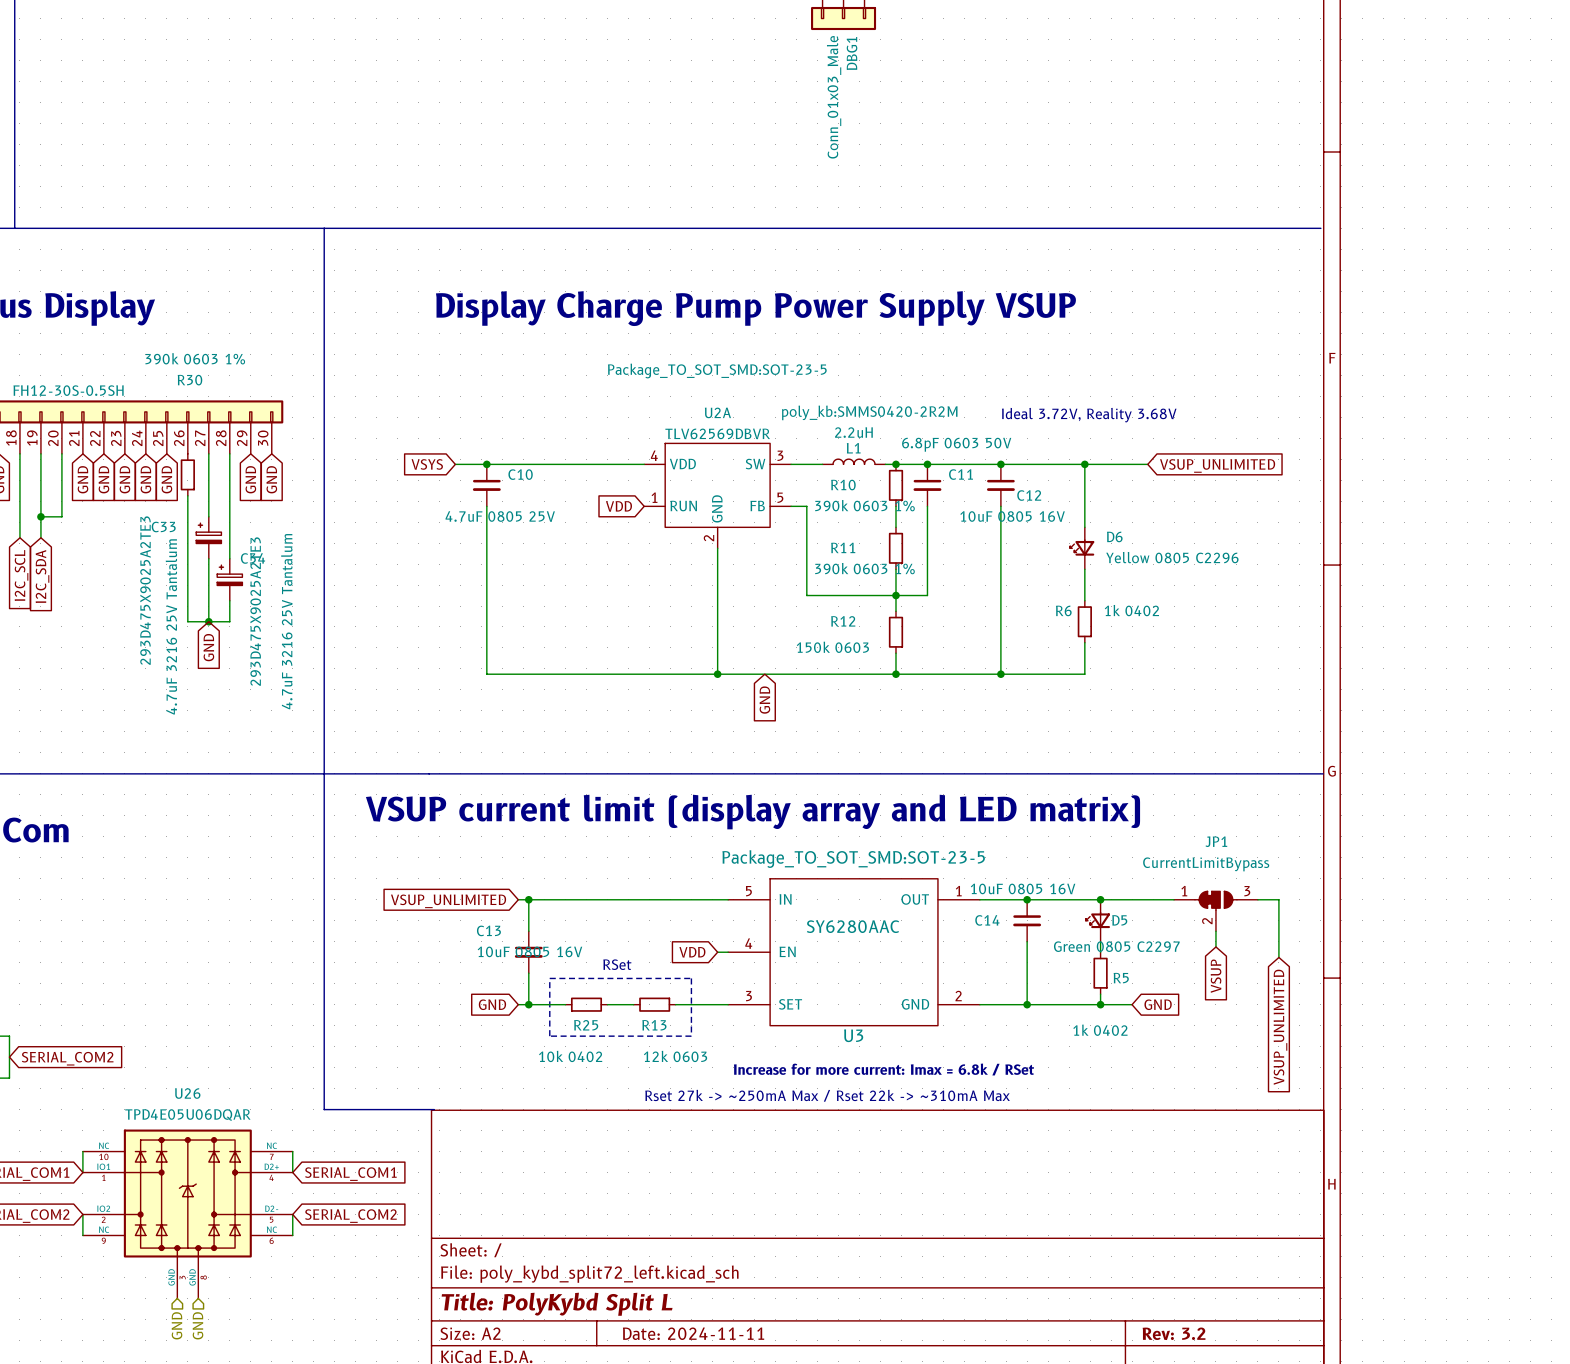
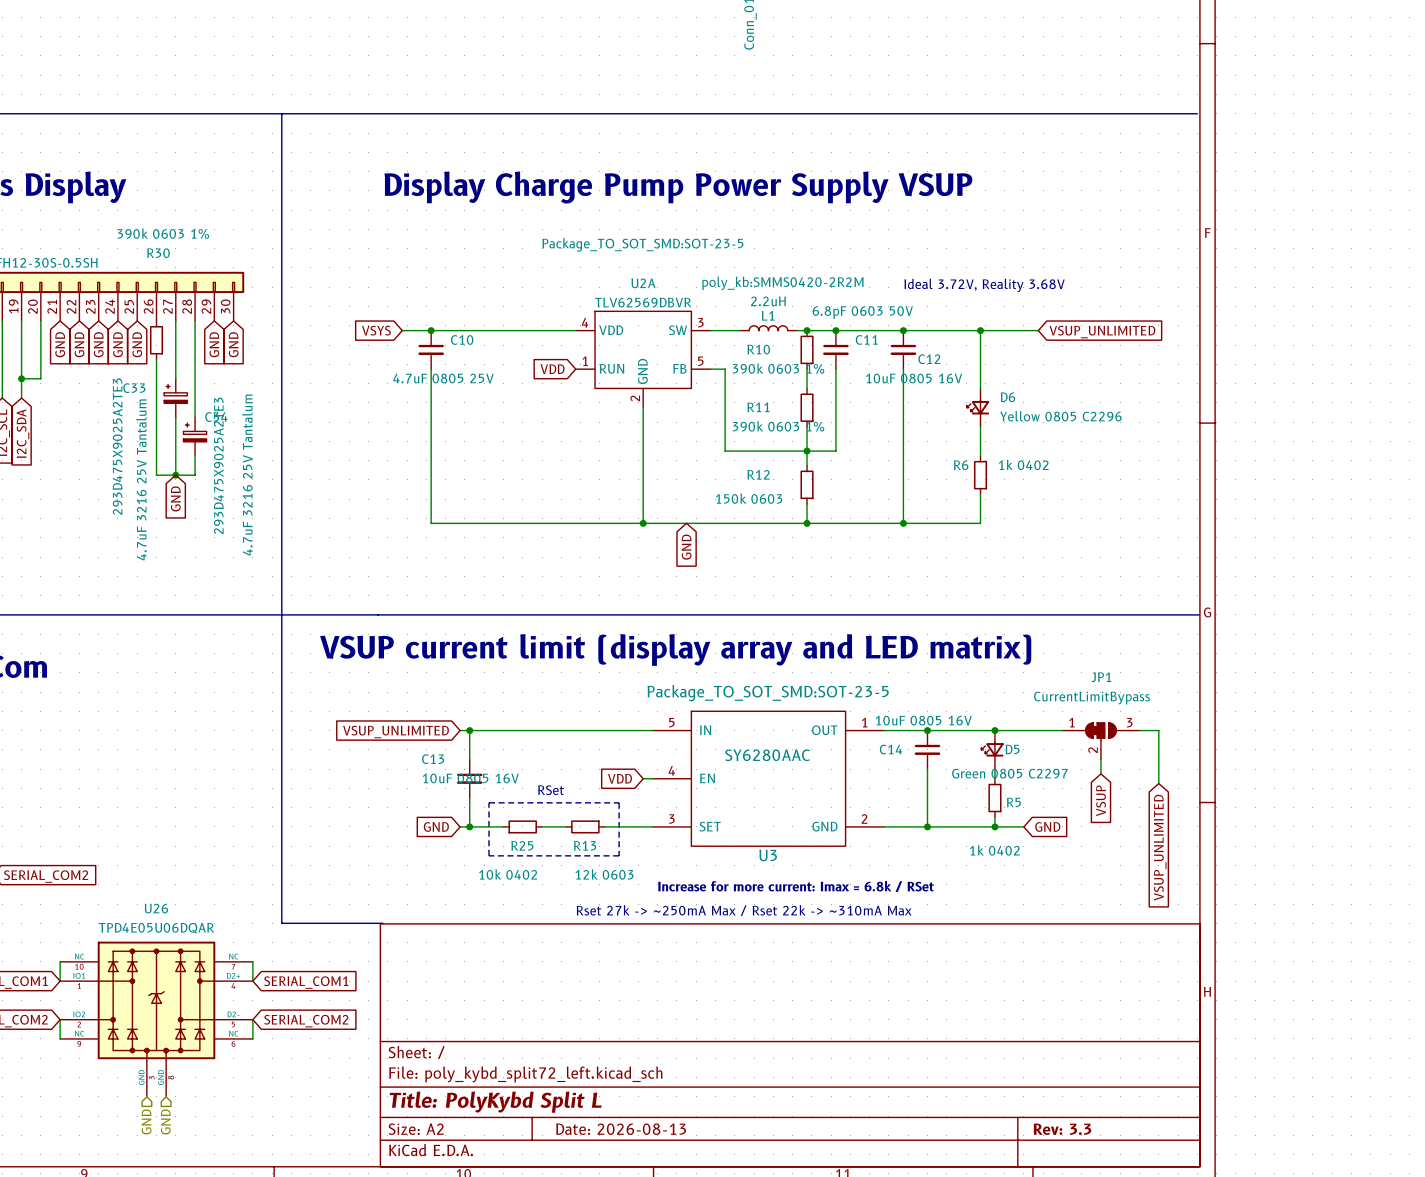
title block: Date: 2024-11-11 (693, 1333) -> Date: 2026-08-13 (621, 1129)
title block: Rev: 3.2 (1174, 1333) -> Rev: 3.3 (1062, 1129)

